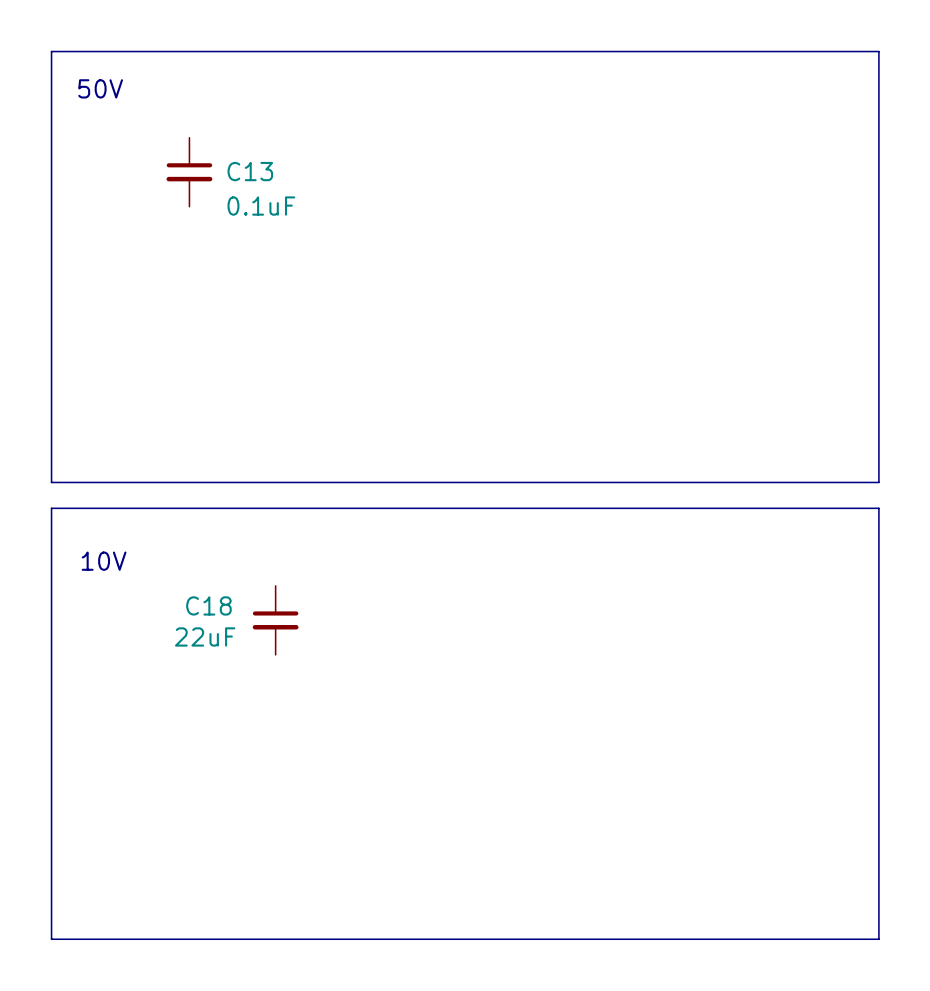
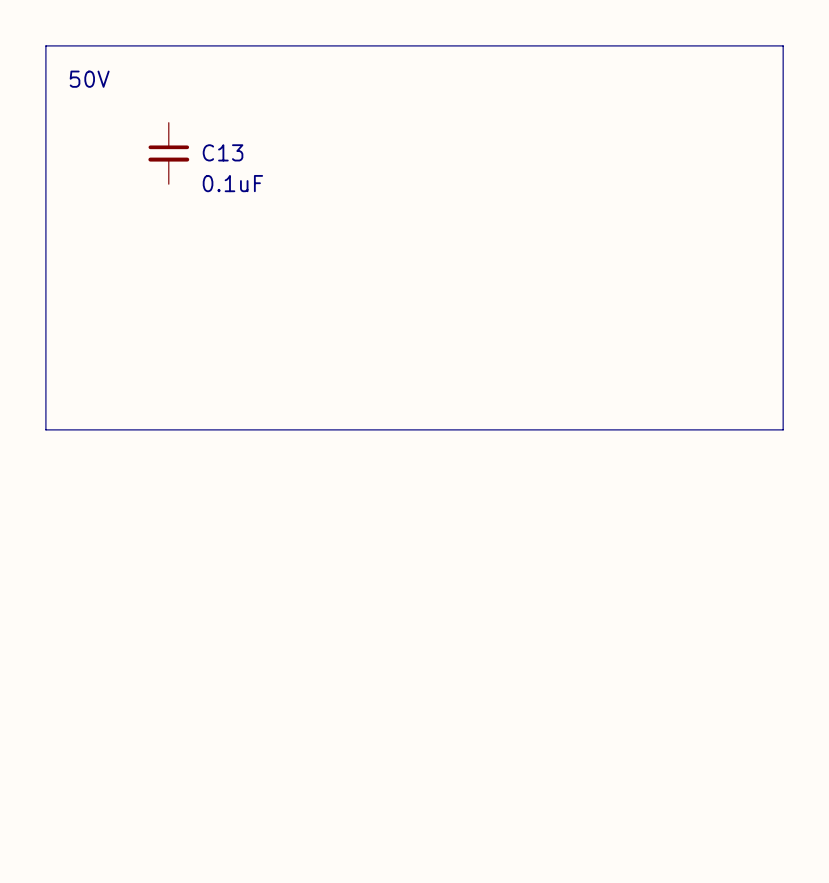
line: (51, 508) (878, 508) (878, 939) (51, 939) (51, 508) -> none
text: 10V (104, 561) -> none
C18: 22uF (275, 620) -> none

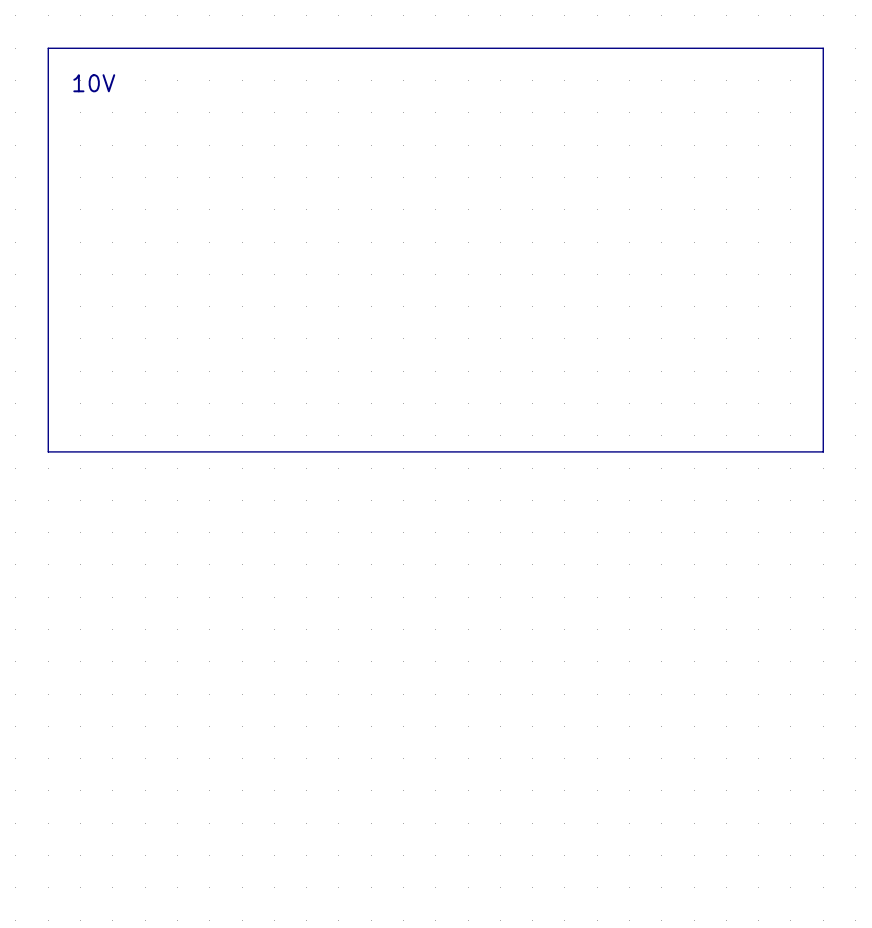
text: 50V (89, 79) -> 10V (94, 83)
C13: 0.1uF (168, 153) -> none

